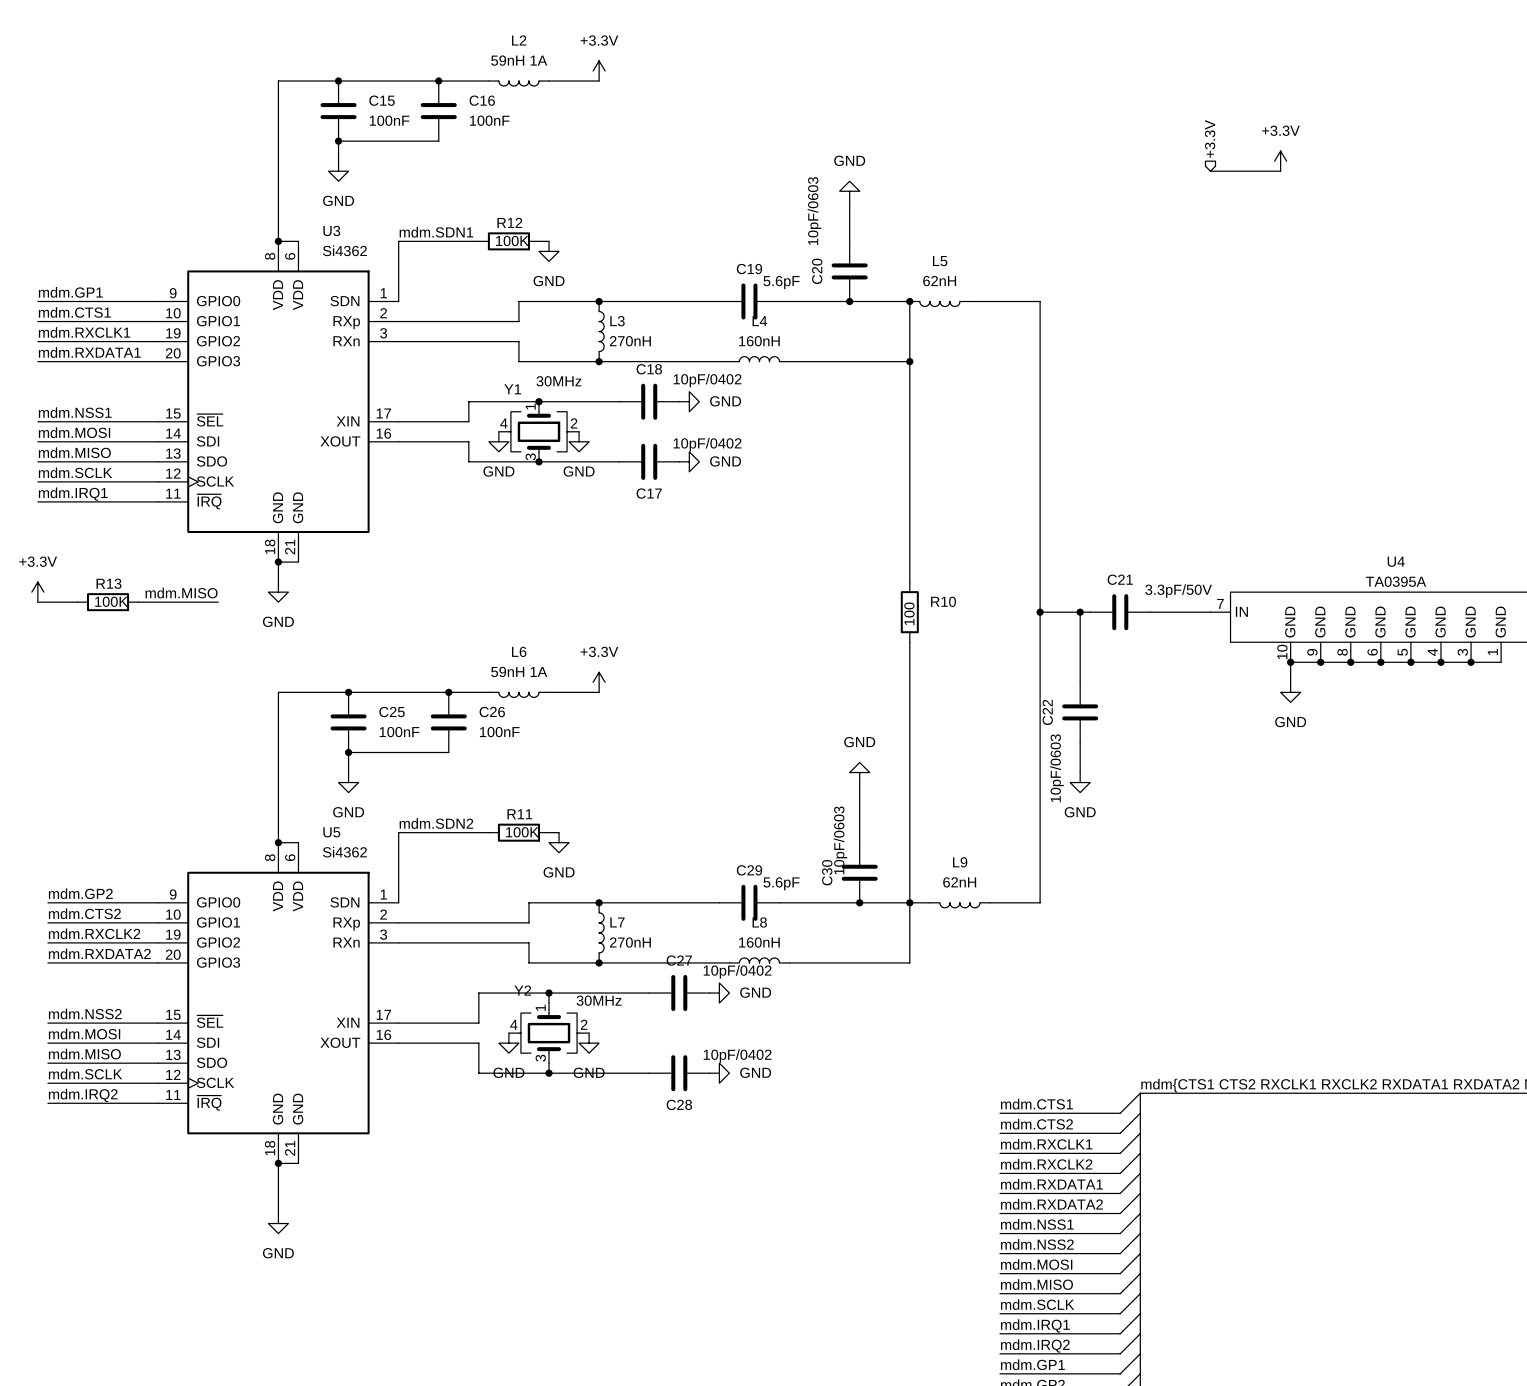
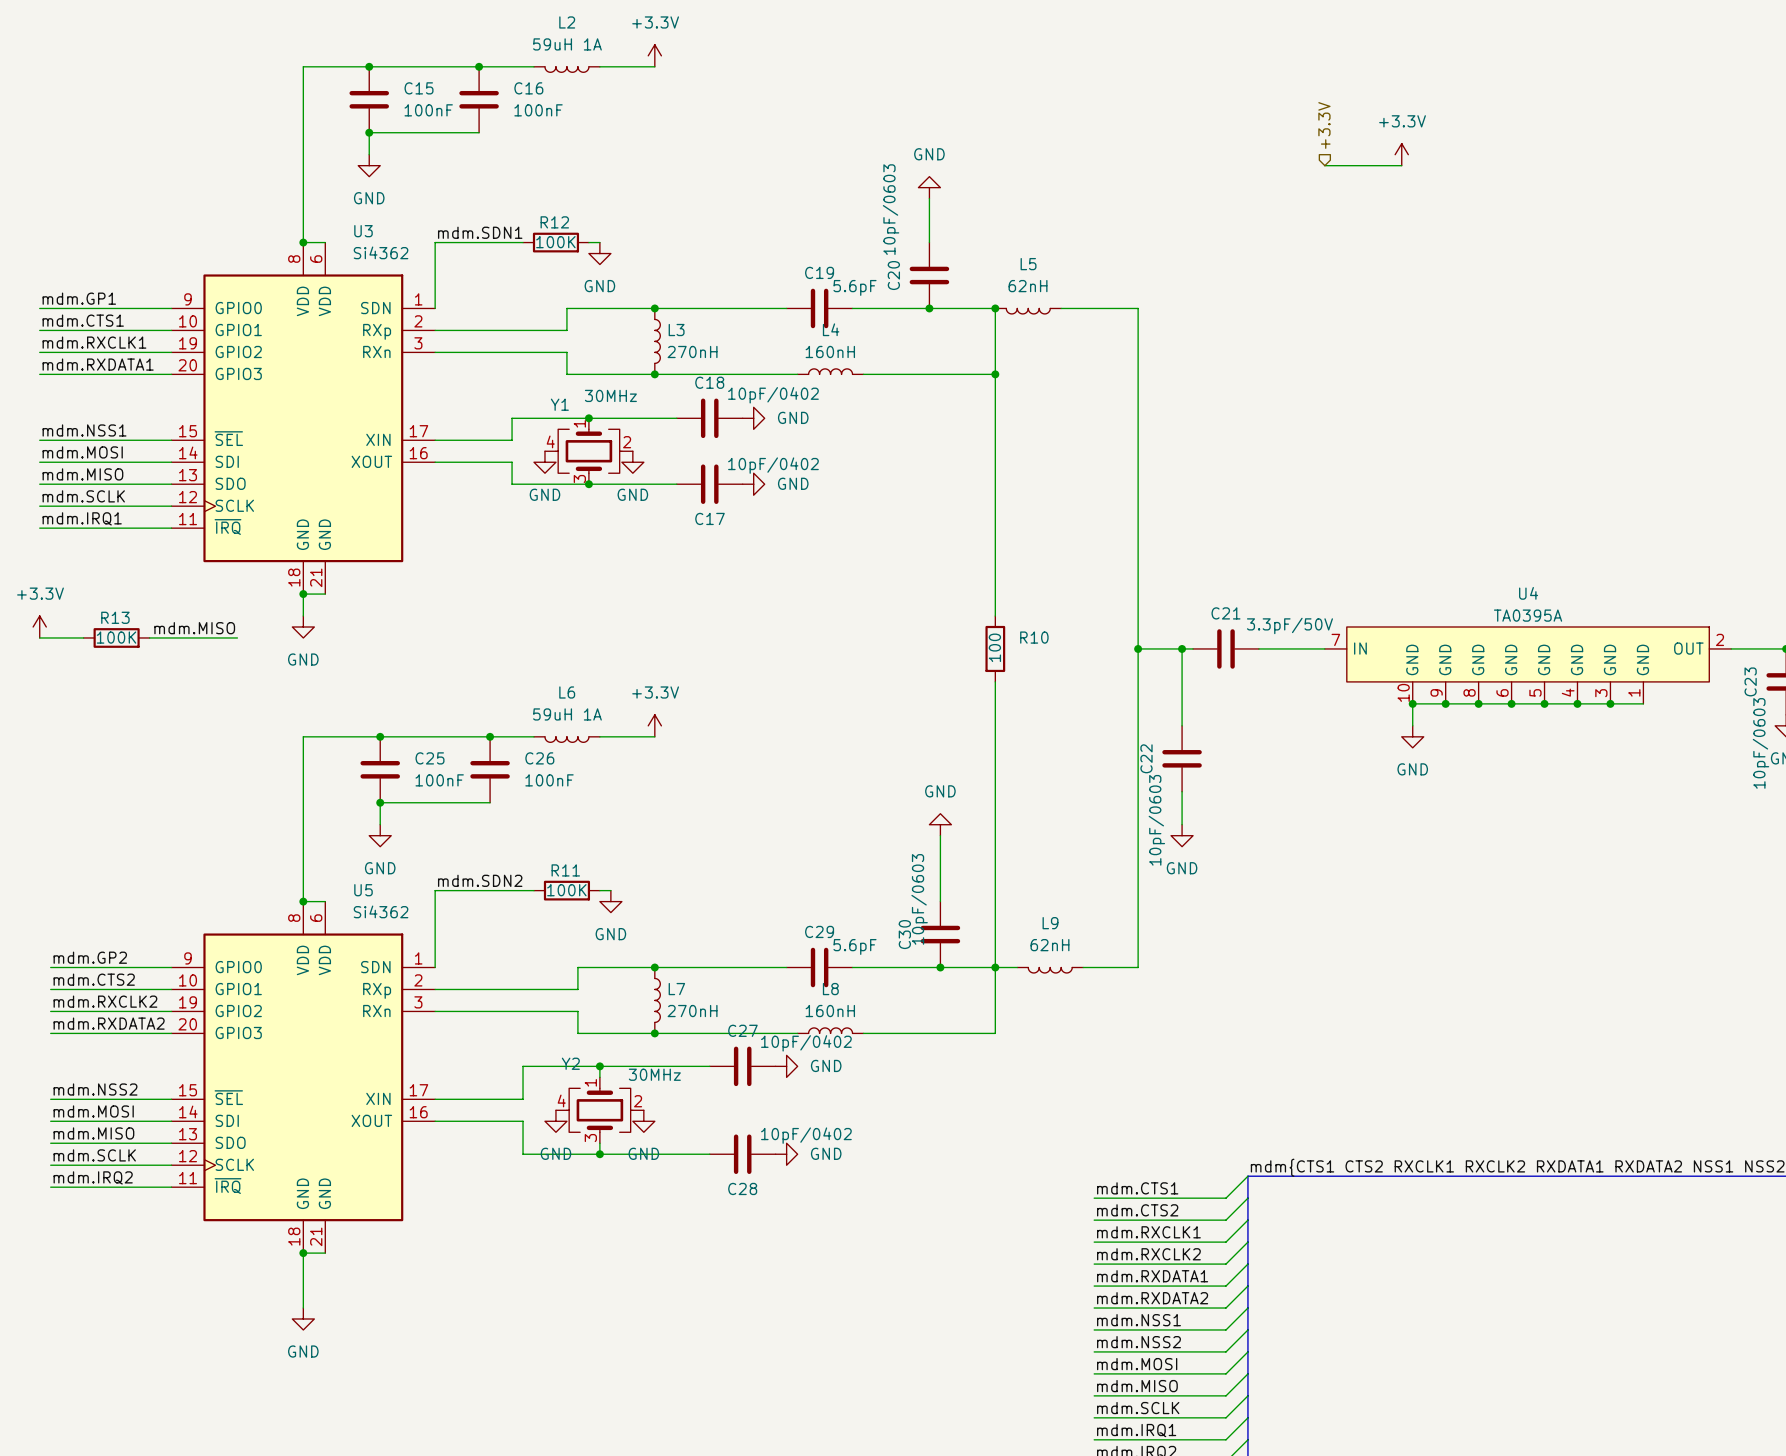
L2 value: 59nH 1A (519, 60) -> 59uH 1A (567, 44)
L6 value: 59nH 1A (519, 671) -> 59uH 1A (567, 714)

